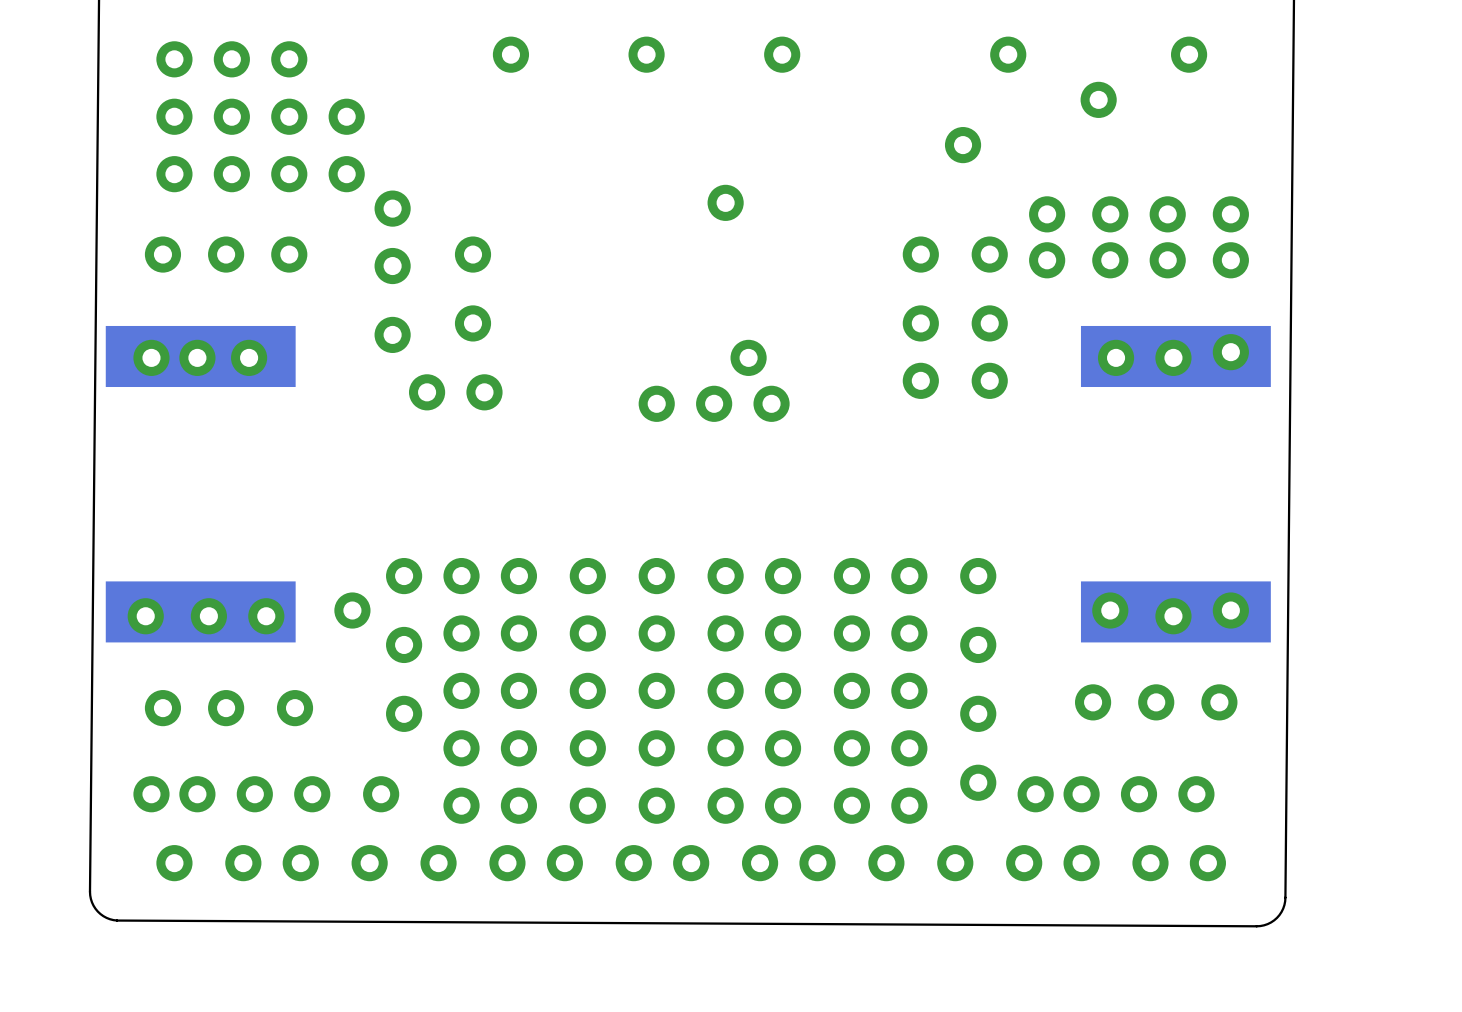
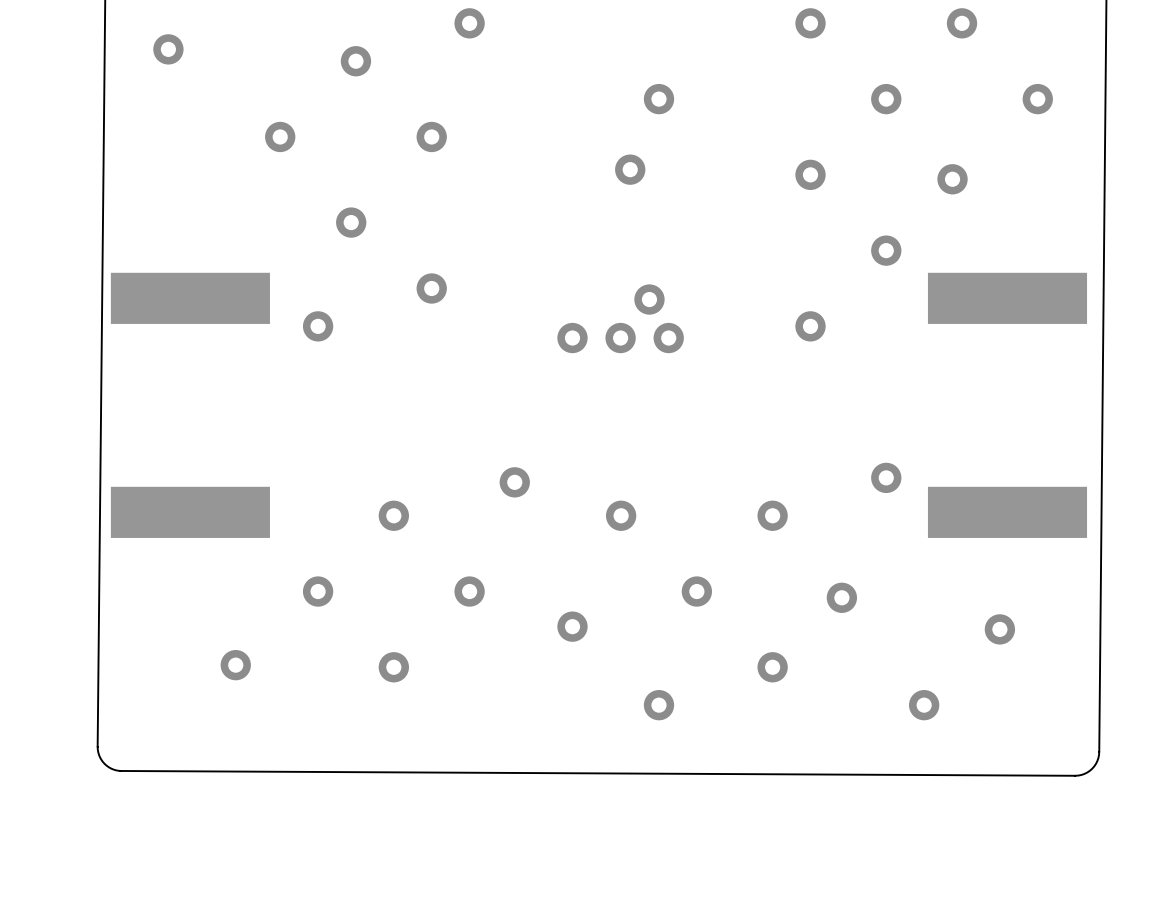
via: none -> (810, 23)
via: none -> (962, 23)
via position: (510, 54) -> (469, 23)
via: (646, 54) -> none
via: (782, 54) -> none
via: (1008, 54) -> none
via: (1189, 54) -> none
via: (231, 59) -> none
via: (289, 59) -> none
via: none -> (355, 61)
via: (1098, 99) -> none
via: (174, 116) -> none
via: (231, 116) -> none
via: (289, 116) -> none
via: (346, 116) -> none
via: none -> (658, 99)
via: none -> (886, 99)
via: none -> (1037, 99)
via: (963, 145) -> none
via: none -> (431, 136)
via: (174, 174) -> none
via: (231, 174) -> none
via position: (289, 174) -> (280, 136)
via: (346, 174) -> none
via: (392, 208) -> none
via: none -> (810, 174)
via: (1047, 214) -> none
via: (1167, 214) -> none
via: (1230, 214) -> none
via: (162, 254) -> none
via: (226, 254) -> none
via: (289, 254) -> none
via: (473, 254) -> none
via: (920, 254) -> none
via: (989, 254) -> none
via: (1047, 260) -> none
via: (1110, 260) -> none
via: (1167, 260) -> none
via: (1230, 260) -> none
via: none -> (886, 250)
via position: (473, 323) -> (431, 288)
via: (920, 323) -> none
via: (989, 323) -> none
via: (392, 334) -> none
via: (1230, 352) -> none
via: (151, 357) -> none
via: (197, 357) -> none
via: (249, 357) -> none
via: (1116, 357) -> none
via: (1173, 357) -> none
via position: (920, 380) -> (810, 326)
via: (989, 380) -> none
via: none -> (318, 326)
via: (427, 392) -> none
via: (484, 392) -> none
via: none -> (886, 477)
via: (404, 576) -> none
via: (461, 576) -> none
via: (518, 576) -> none
via: (656, 576) -> none
via: (725, 576) -> none
via: (783, 576) -> none
via: (851, 576) -> none
via: (909, 576) -> none
via: (978, 576) -> none
via: (352, 610) -> none
via: (1110, 610) -> none
via: (1230, 610) -> none
via: (145, 616) -> none
via: (208, 616) -> none
via: (266, 616) -> none
via: (1173, 616) -> none
via position: (461, 633) -> (393, 515)
via: (518, 633) -> none
via: (587, 633) -> none
via: (656, 633) -> none
via position: (725, 633) -> (621, 515)
via: (783, 633) -> none
via: (851, 633) -> none
via position: (909, 633) -> (772, 515)
via: (404, 644) -> none
via: (978, 644) -> none
via: (461, 690) -> none
via position: (518, 690) -> (469, 591)
via: (587, 690) -> none
via: (656, 690) -> none
via: (725, 690) -> none
via position: (783, 690) -> (696, 591)
via: (851, 690) -> none
via: (909, 690) -> none
via: (1093, 702) -> none
via: (1156, 702) -> none
via: (1219, 702) -> none
via: none -> (318, 591)
via: (162, 708) -> none
via: (226, 708) -> none
via: (295, 708) -> none
via: (404, 713) -> none
via: (461, 748) -> none
via: (518, 748) -> none
via: (587, 748) -> none
via: (725, 748) -> none
via: (783, 748) -> none
via: (851, 748) -> none
via: (909, 748) -> none
via: none -> (999, 629)
via: (978, 782) -> none
via: (151, 794) -> none
via: (197, 794) -> none
via: (312, 794) -> none
via: (381, 794) -> none
via: (1035, 794) -> none
via: (1081, 794) -> none
via: (1139, 794) -> none
via: (1196, 794) -> none
via position: (461, 805) -> (393, 667)
via: (518, 805) -> none
via: (587, 805) -> none
via: (656, 805) -> none
via: (725, 805) -> none
via: (783, 805) -> none
via: (851, 805) -> none
via position: (909, 805) -> (772, 667)
via: (174, 863) -> none
via: (243, 863) -> none
via: (300, 863) -> none
via: (369, 863) -> none
via: (438, 863) -> none
via: (507, 863) -> none
via: (564, 863) -> none
via: (633, 863) -> none
via: (691, 863) -> none
via position: (760, 863) -> (658, 705)
via: (817, 863) -> none
via: (886, 863) -> none
via: (955, 863) -> none
via: (1024, 863) -> none
via position: (1081, 863) -> (924, 705)
via: (1150, 863) -> none
via: (1207, 863) -> none

